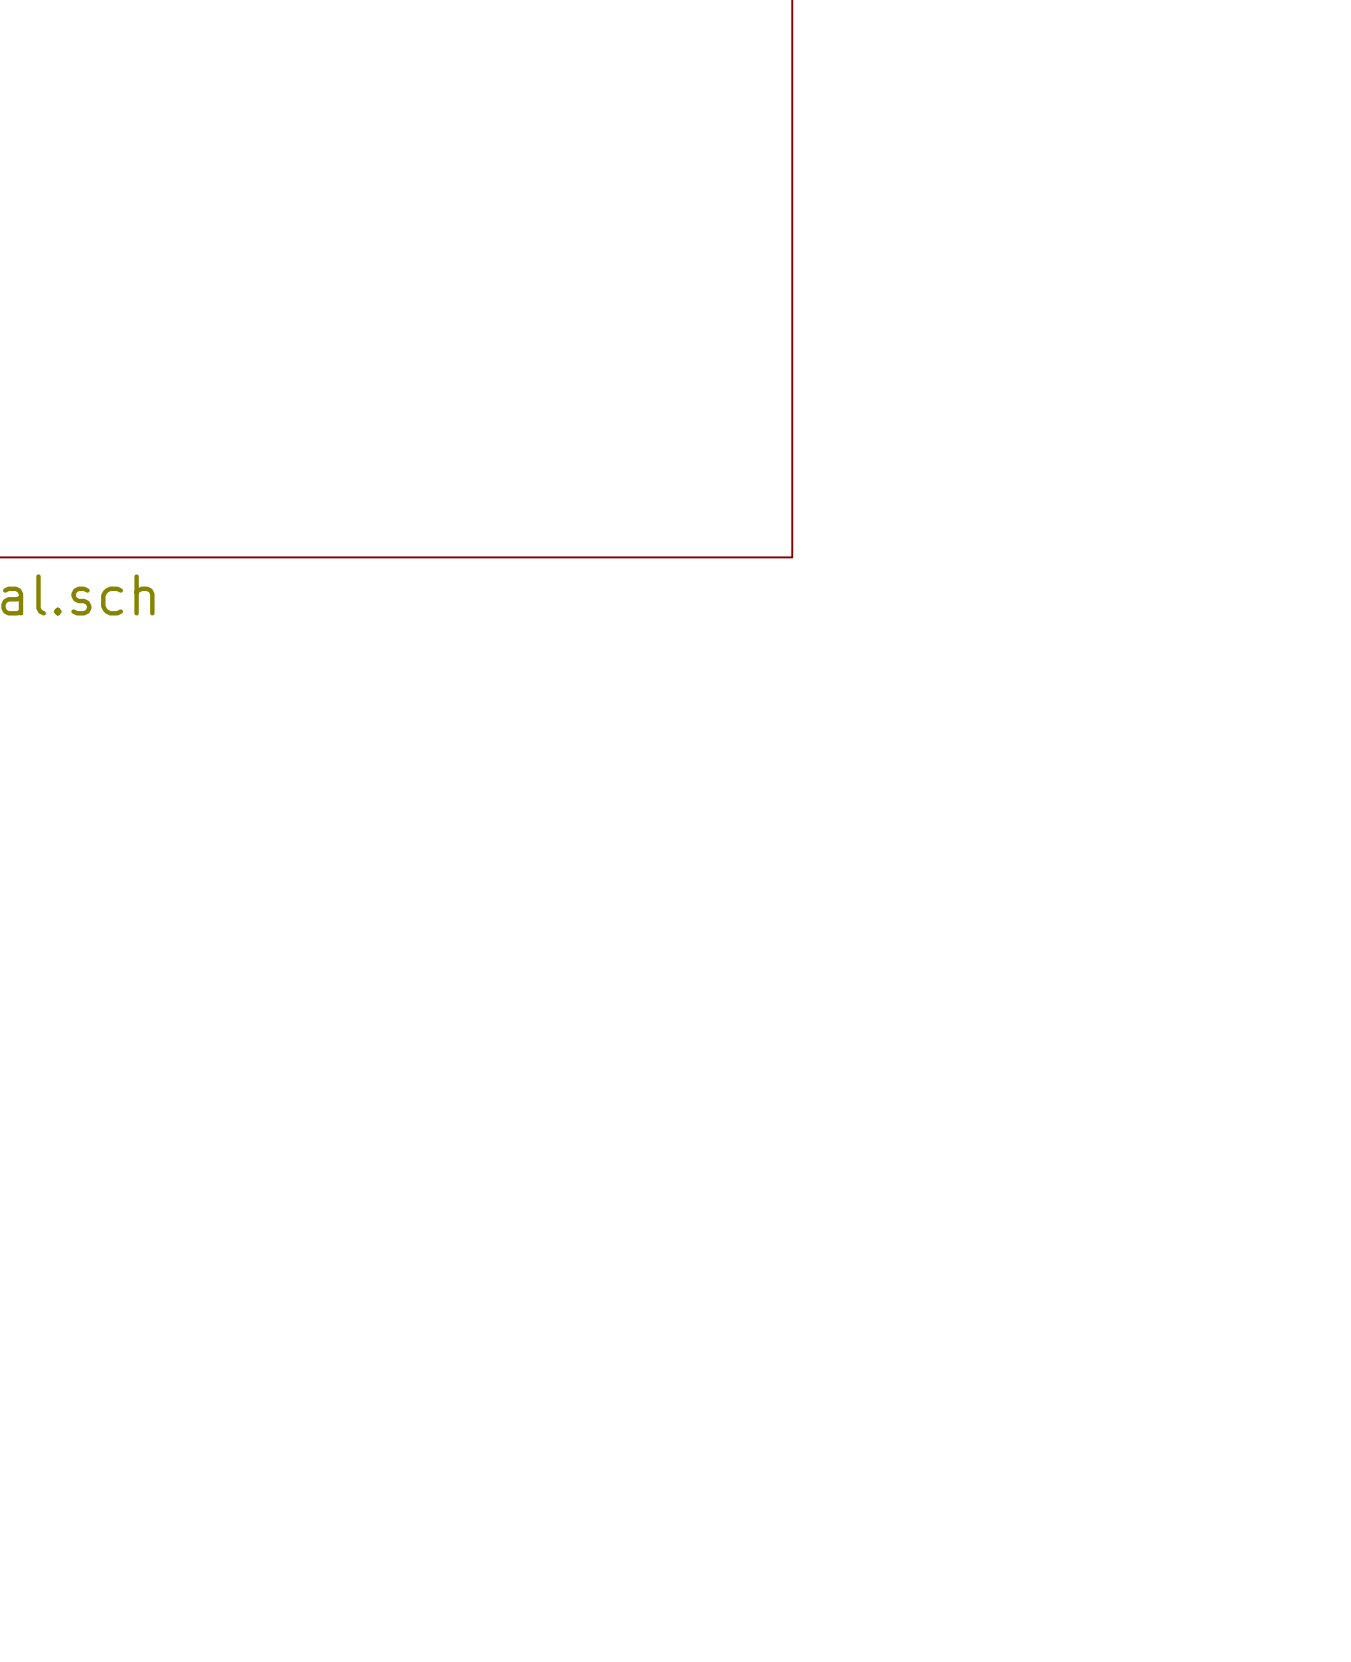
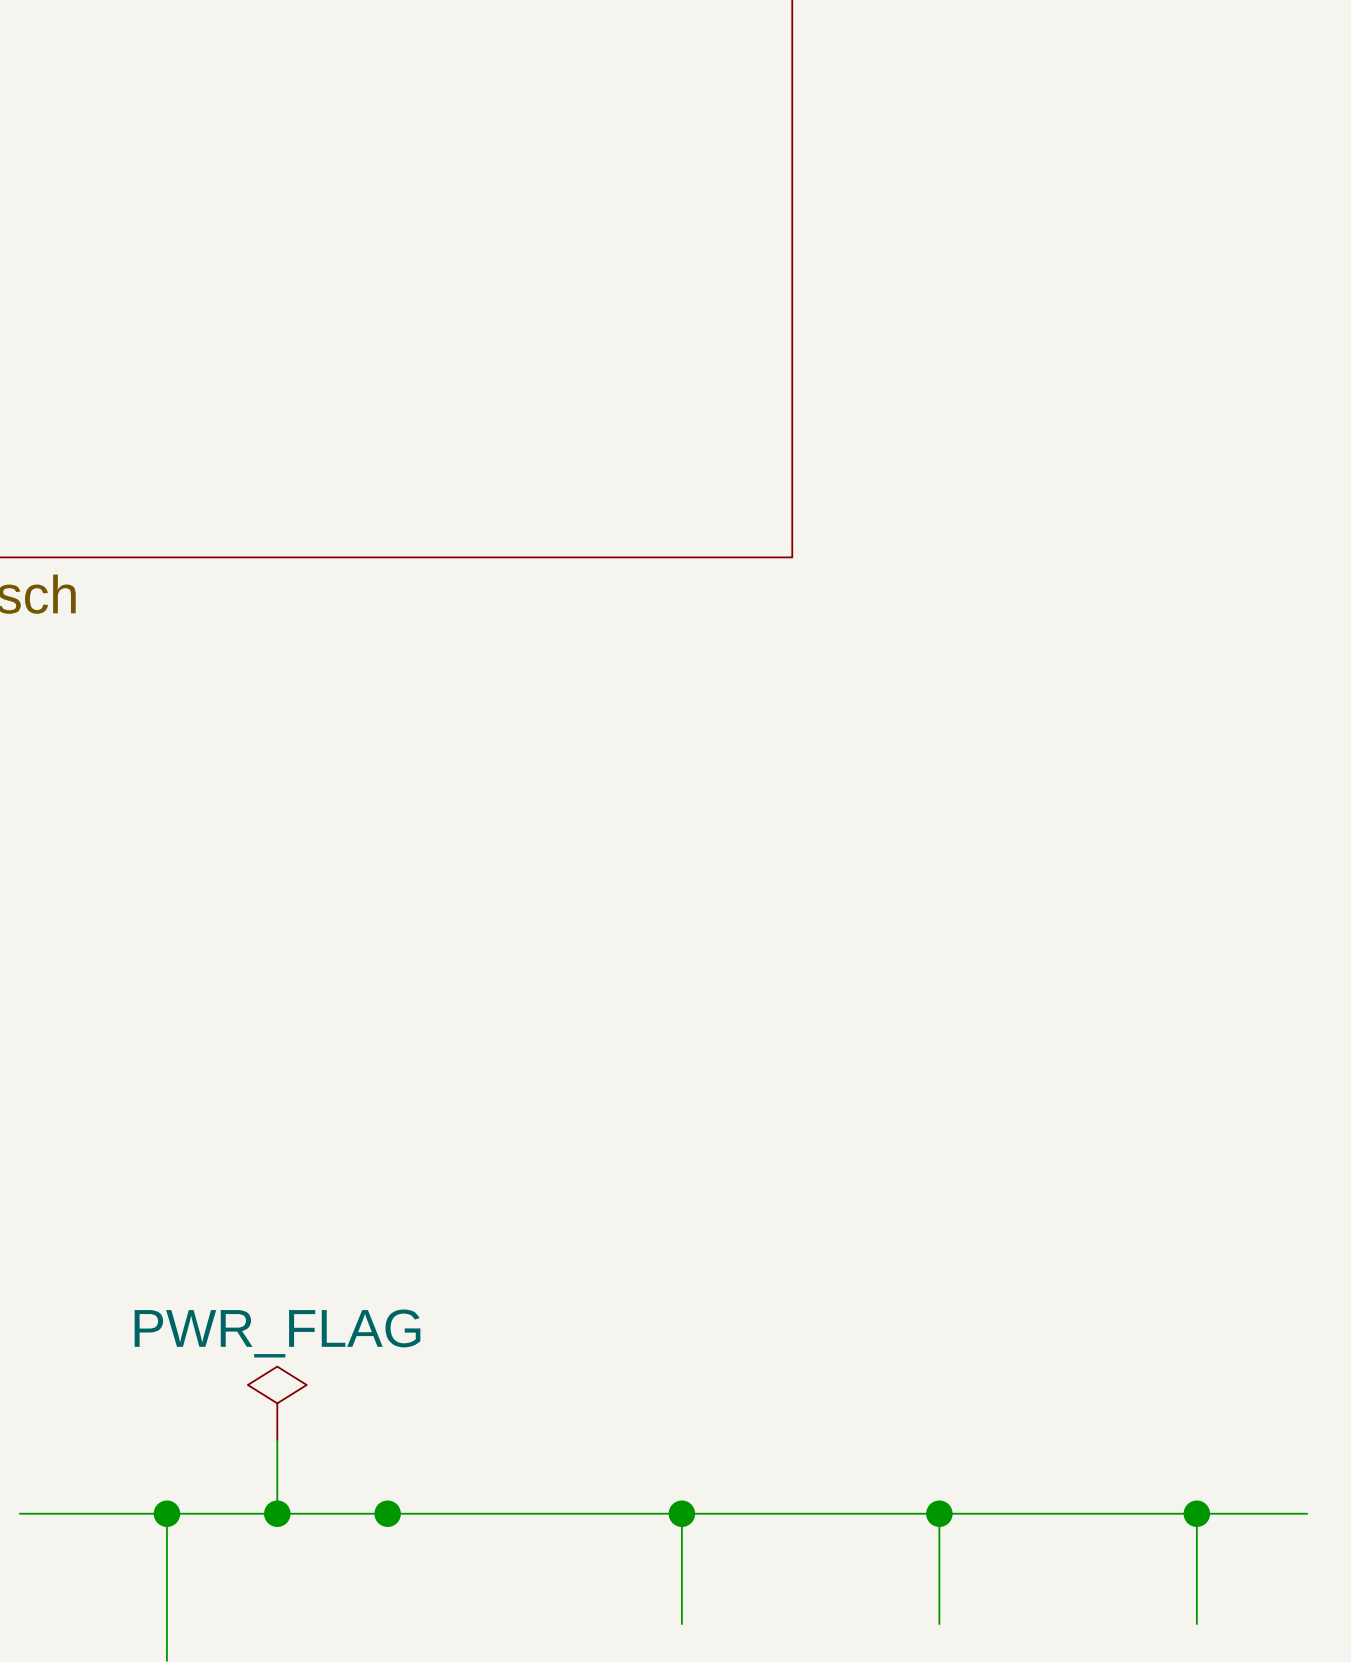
power symbol: none -> PWR_FLAG (277, 1403)
wire: none -> (277, 1440) (277, 1513)
wire: none -> (19, 1513) (1307, 1513)
wire: none -> (166, 1513) (166, 1660)
junction: none -> (166, 1513)
junction: none -> (277, 1513)
junction: none -> (387, 1513)
wire: none -> (681, 1513) (681, 1624)
junction: none -> (681, 1513)
wire: none -> (939, 1513) (939, 1624)
junction: none -> (939, 1513)
wire: none -> (1196, 1513) (1196, 1624)
junction: none -> (1196, 1513)

